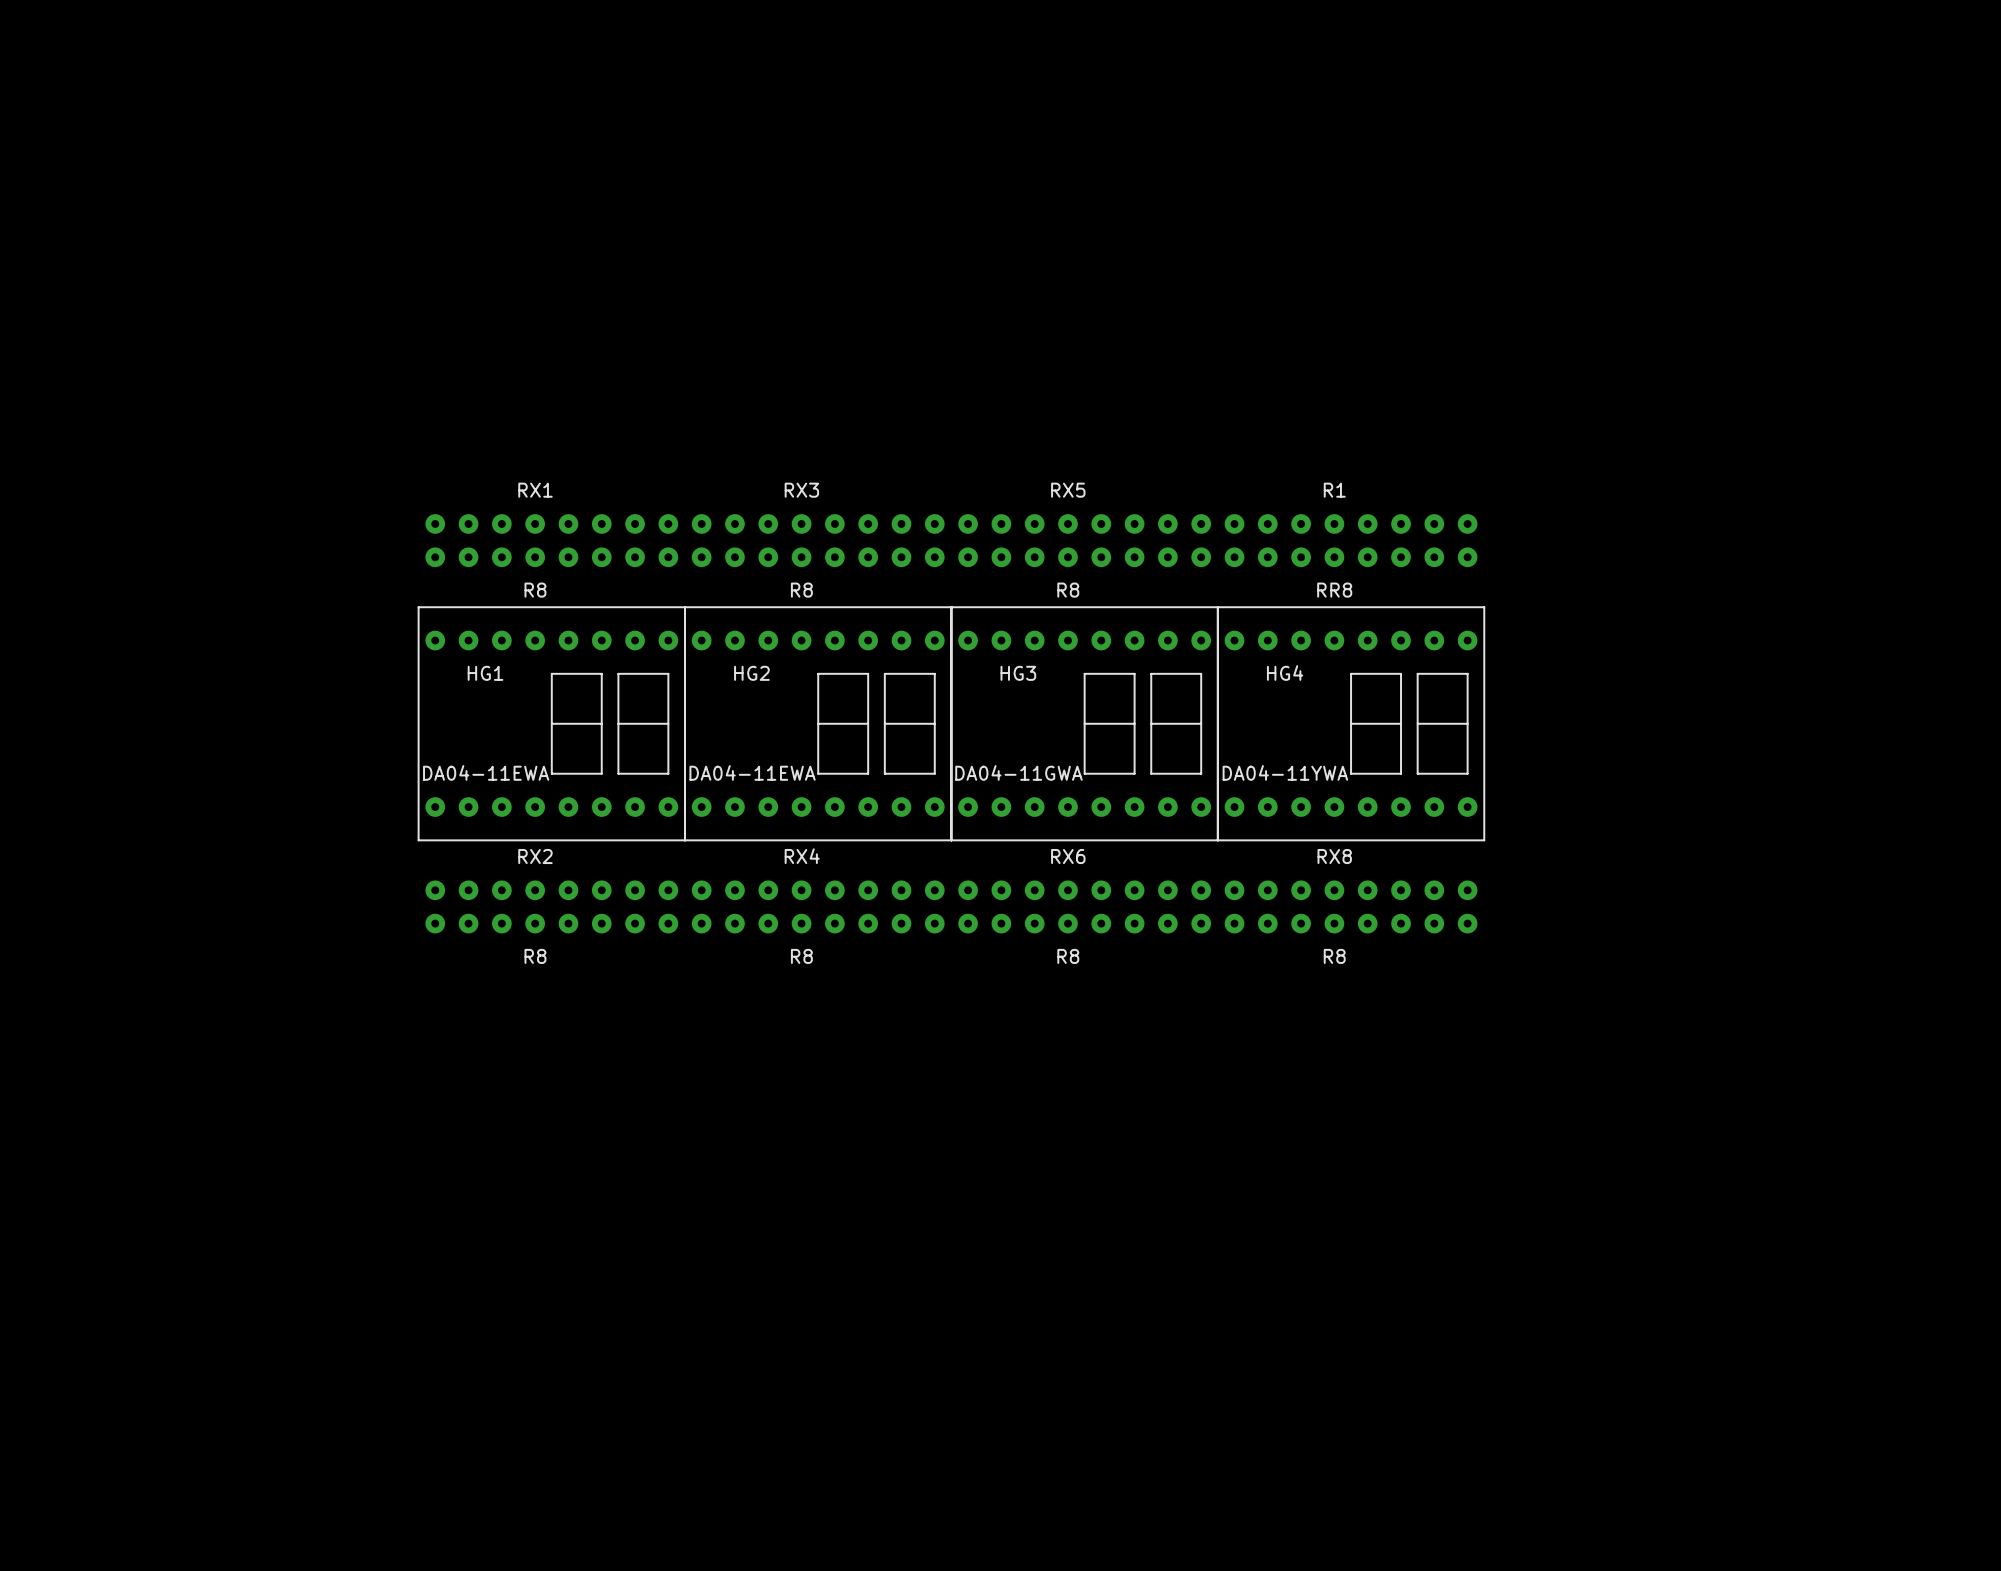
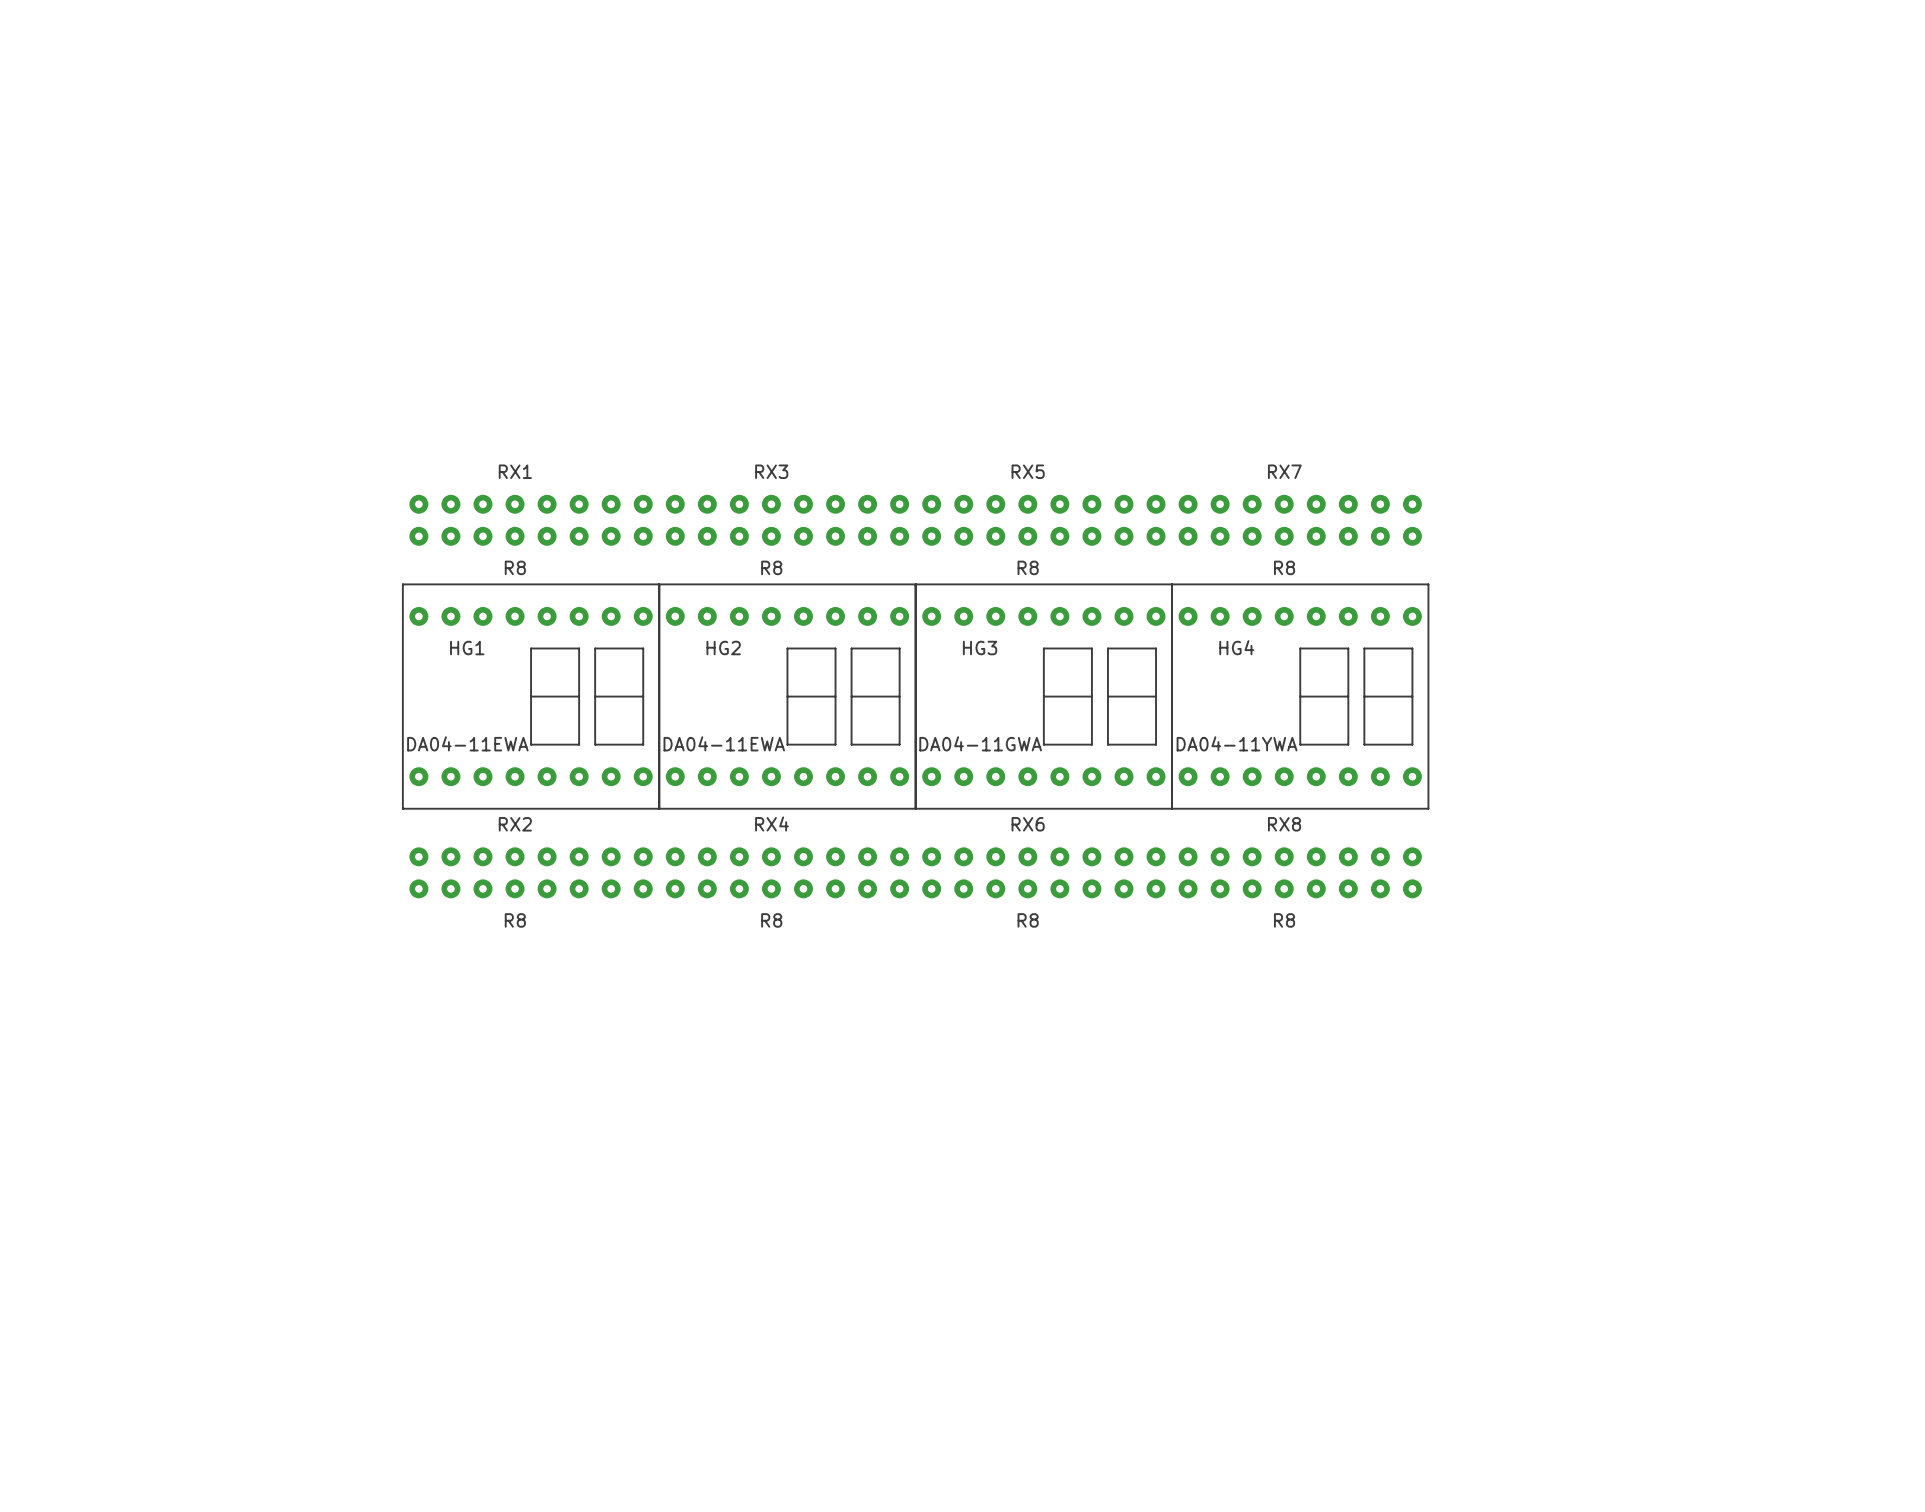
R1 name: R1 (1334, 490) -> RX7 (1284, 471)
R1 value: RR8 (1334, 590) -> R8 (1284, 567)

